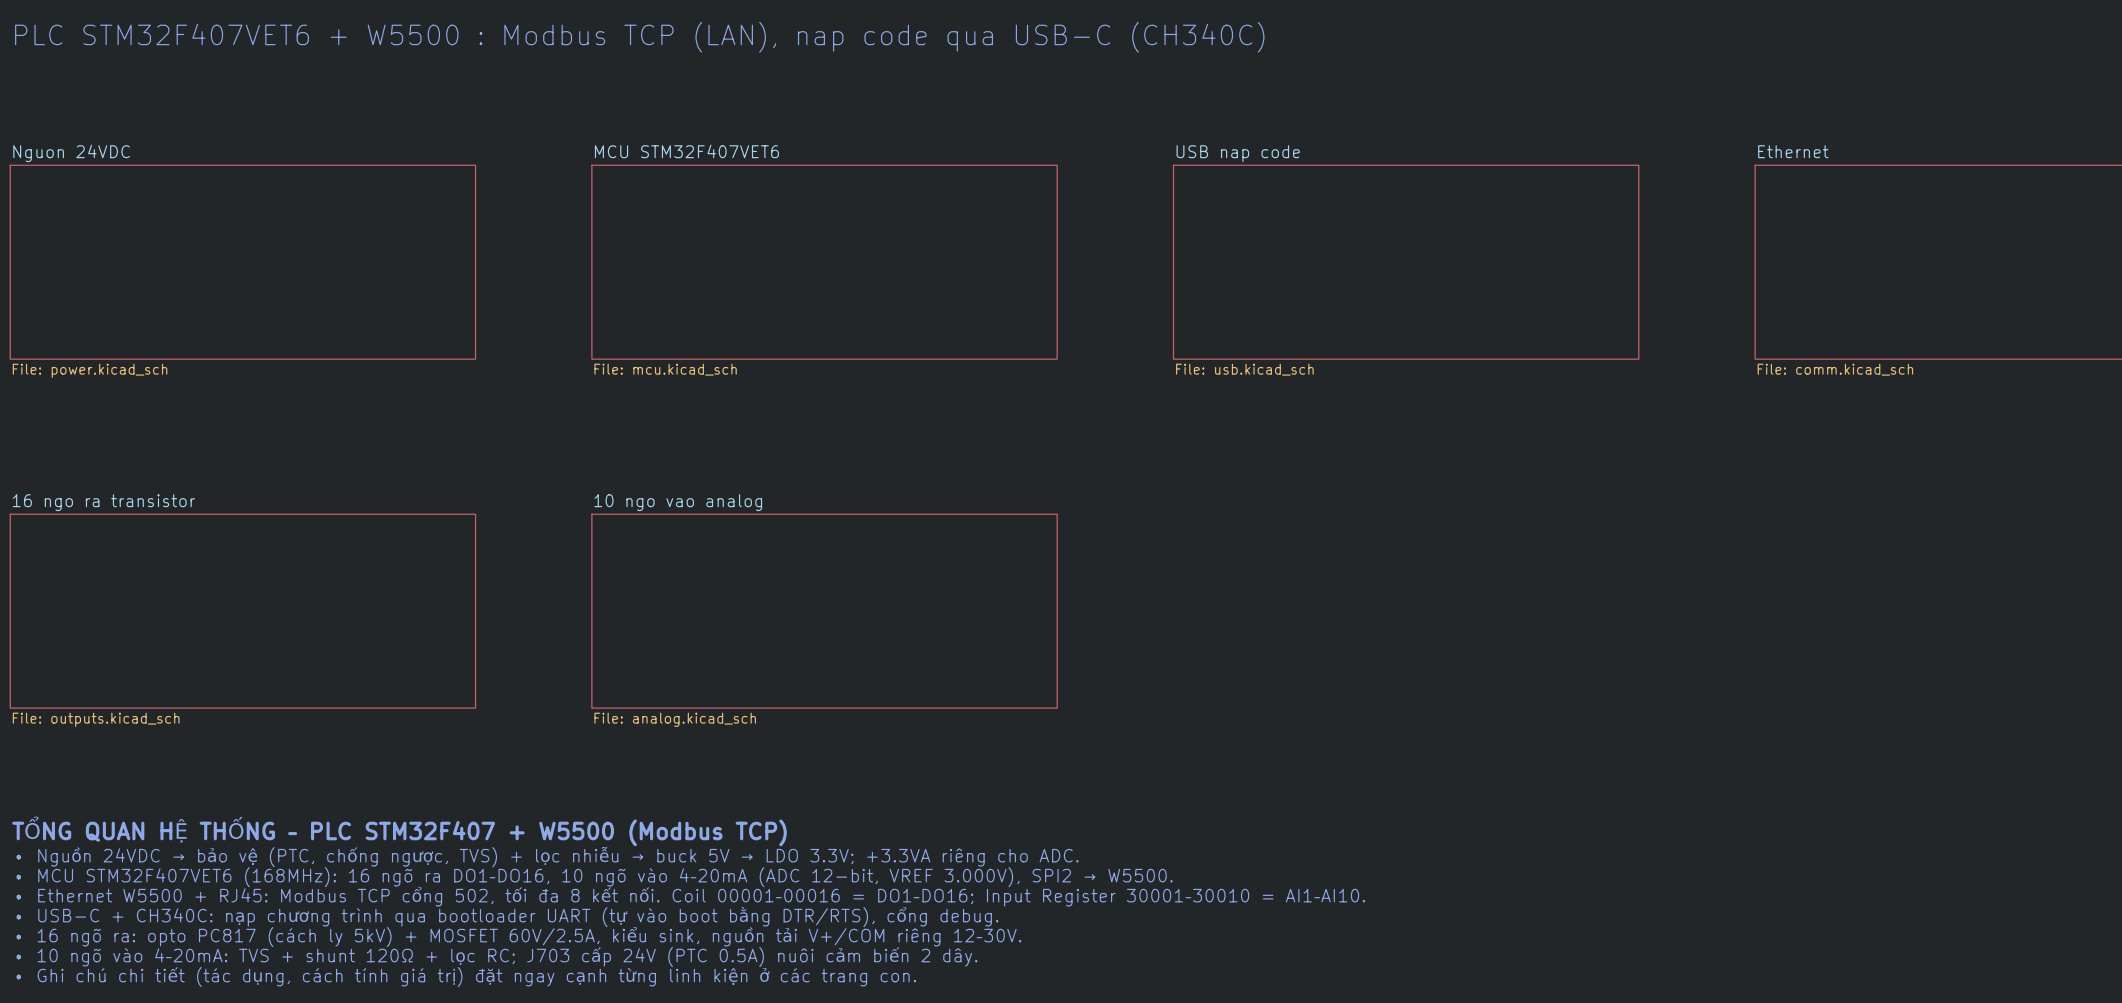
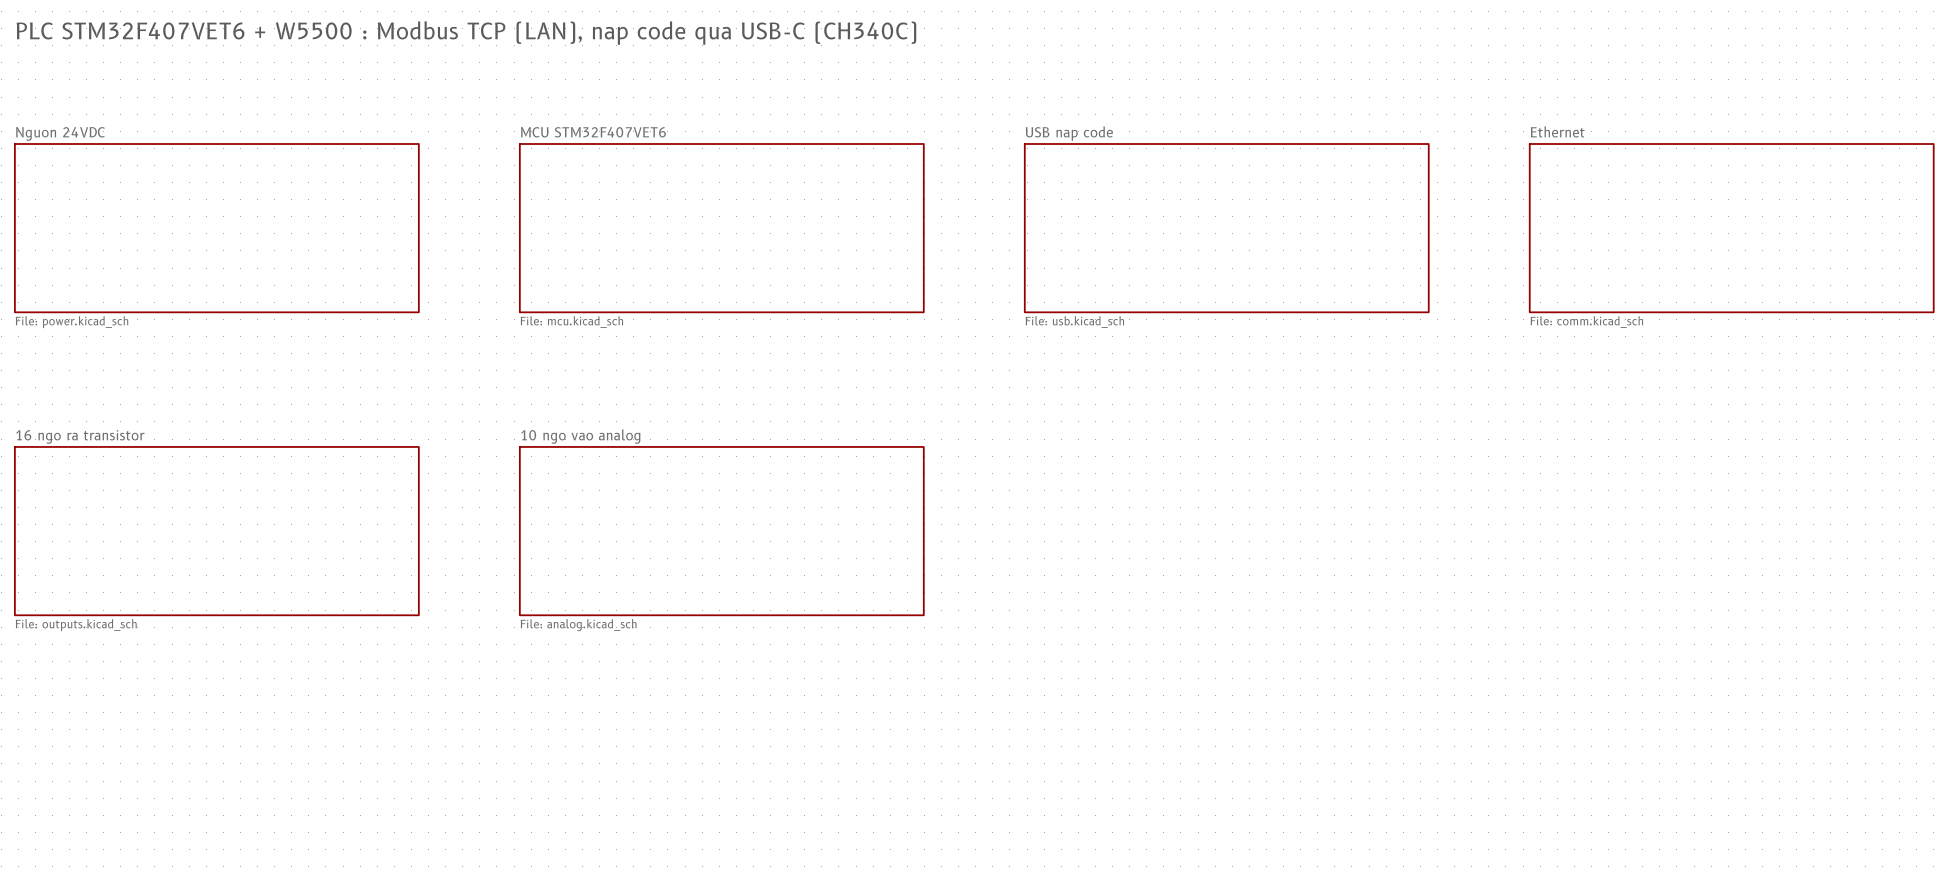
text: TỔNG QUAN HỆ THỐNG – PLC STM32F407 + W5500 (Modbus TCP) (399, 830) -> none
text: • Nguồn 24VDC → bảo vệ (PTC, chống ngược, TVS) + lọc nhiễu → buck 5V → LDO 3.3V; +3.3VA riêng cho ADC. (547, 856) -> none
text: • MCU STM32F407VET6 (168MHz): 16 ngõ ra DO1–DO16, 10 ngõ vào 4–20mA (ADC 12-bit, VREF 3.000V), SPI2 → W5500. (594, 877) -> none
text: • Ethernet W5500 + RJ45: Modbus TCP cổng 502, tối đa 8 kết nối. Coil 00001–00016 = DO1–DO16; Input Register 30001–30010 = AI1–AI10. (690, 896) -> none
text: • USB-C + CH340C: nạp chương trình qua bootloader UART (tự vào boot bằng DTR/RTS), cổng debug. (507, 916) -> none
text: • 16 ngõ ra: opto PC817 (cách ly 5kV) + MOSFET 60V/2.5A, kiểu sink, nguồn tải V+/COM riêng 12–30V. (518, 936) -> none
text: • 10 ngõ vào 4–20mA: TVS + shunt 120Ω + lọc RC; J703 cấp 24V (PTC 0.5A) nuôi cảm biến 2 dây. (496, 956) -> none
text: • Ghi chú chi tiết (tác dụng, cách tính giá trị) đặt ngay cạnh từng linh kiện ở các trang con. (466, 976) -> none

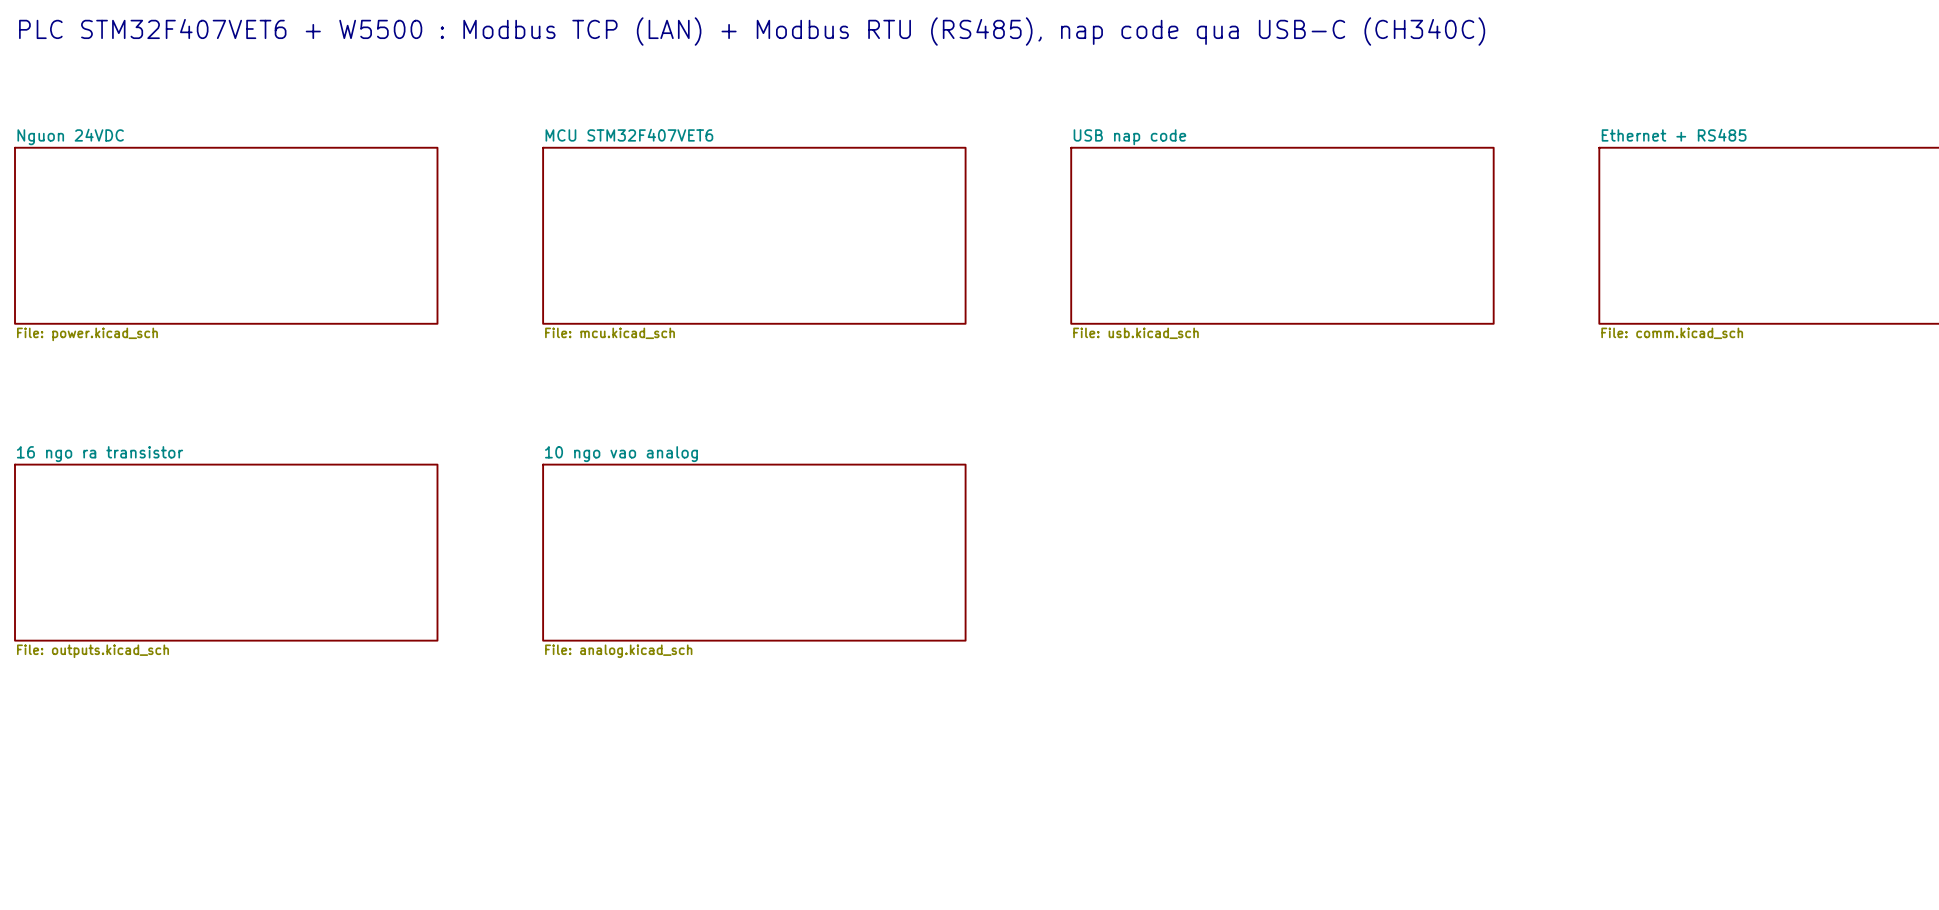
text: PLC STM32F407VET6 + W5500 : Modbus TCP (LAN), nap code qua USB-C (CH340C) (466, 33) -> PLC STM32F407VET6 + W5500 : Modbus TCP (LAN) + Modbus RTU (RS485), nap code qua USB-C (CH340C) (752, 31)
sheet Ethernet name: Ethernet (1557, 131) -> Ethernet + RS485 (1674, 135)

